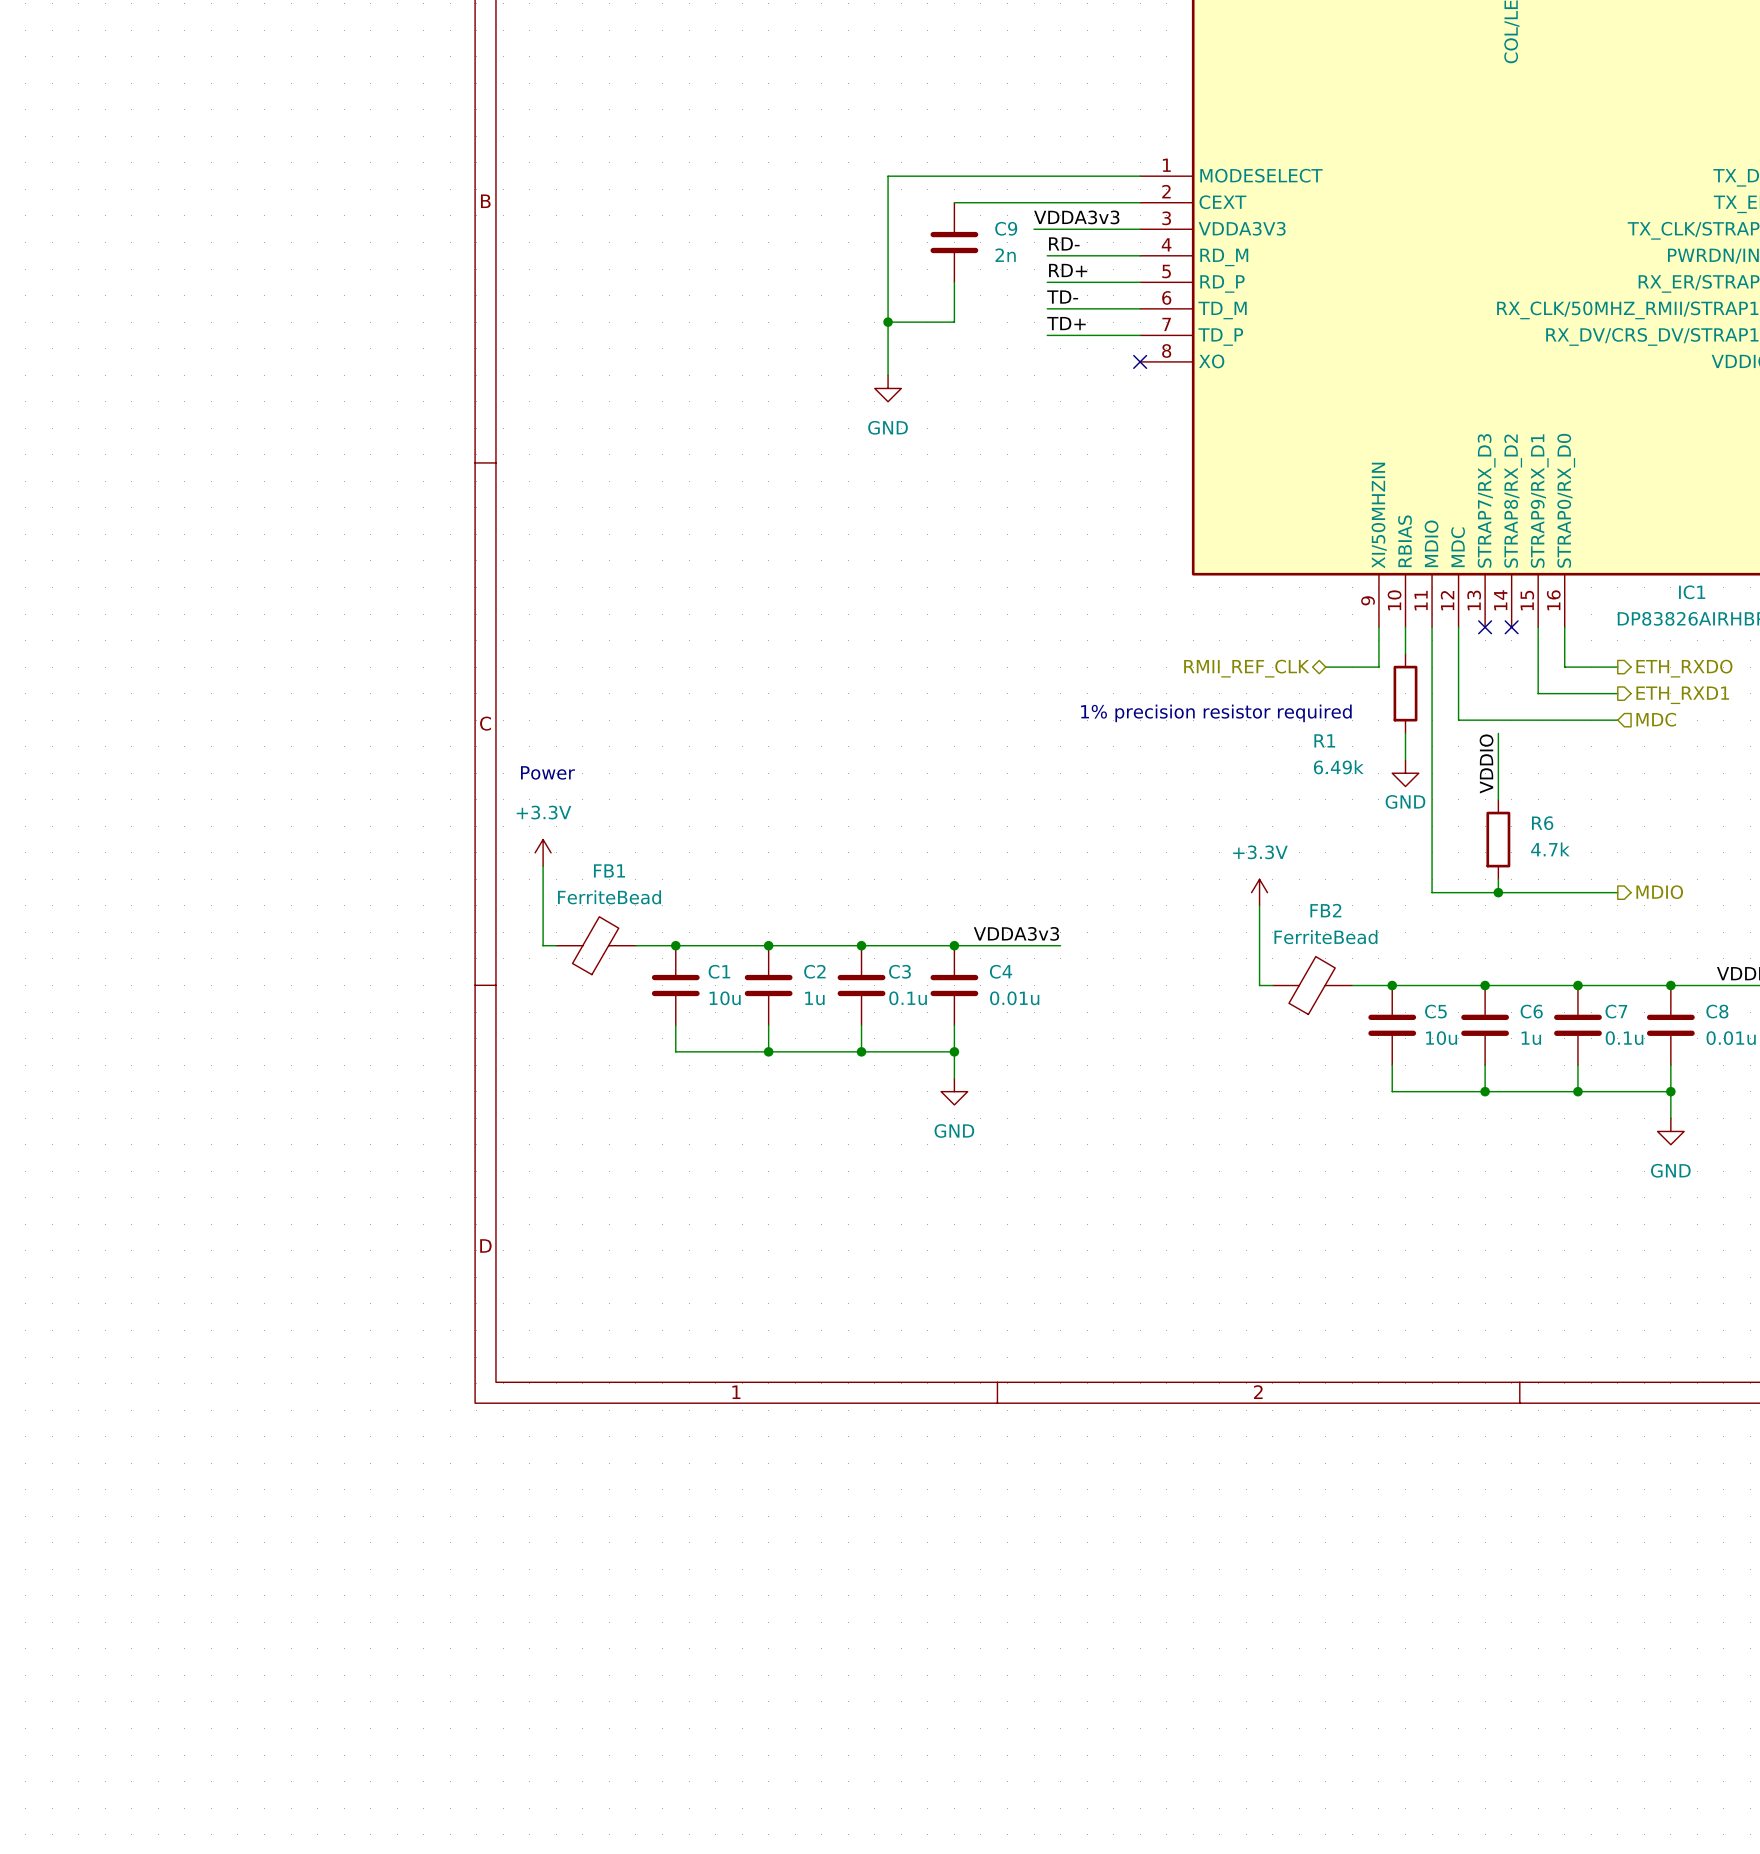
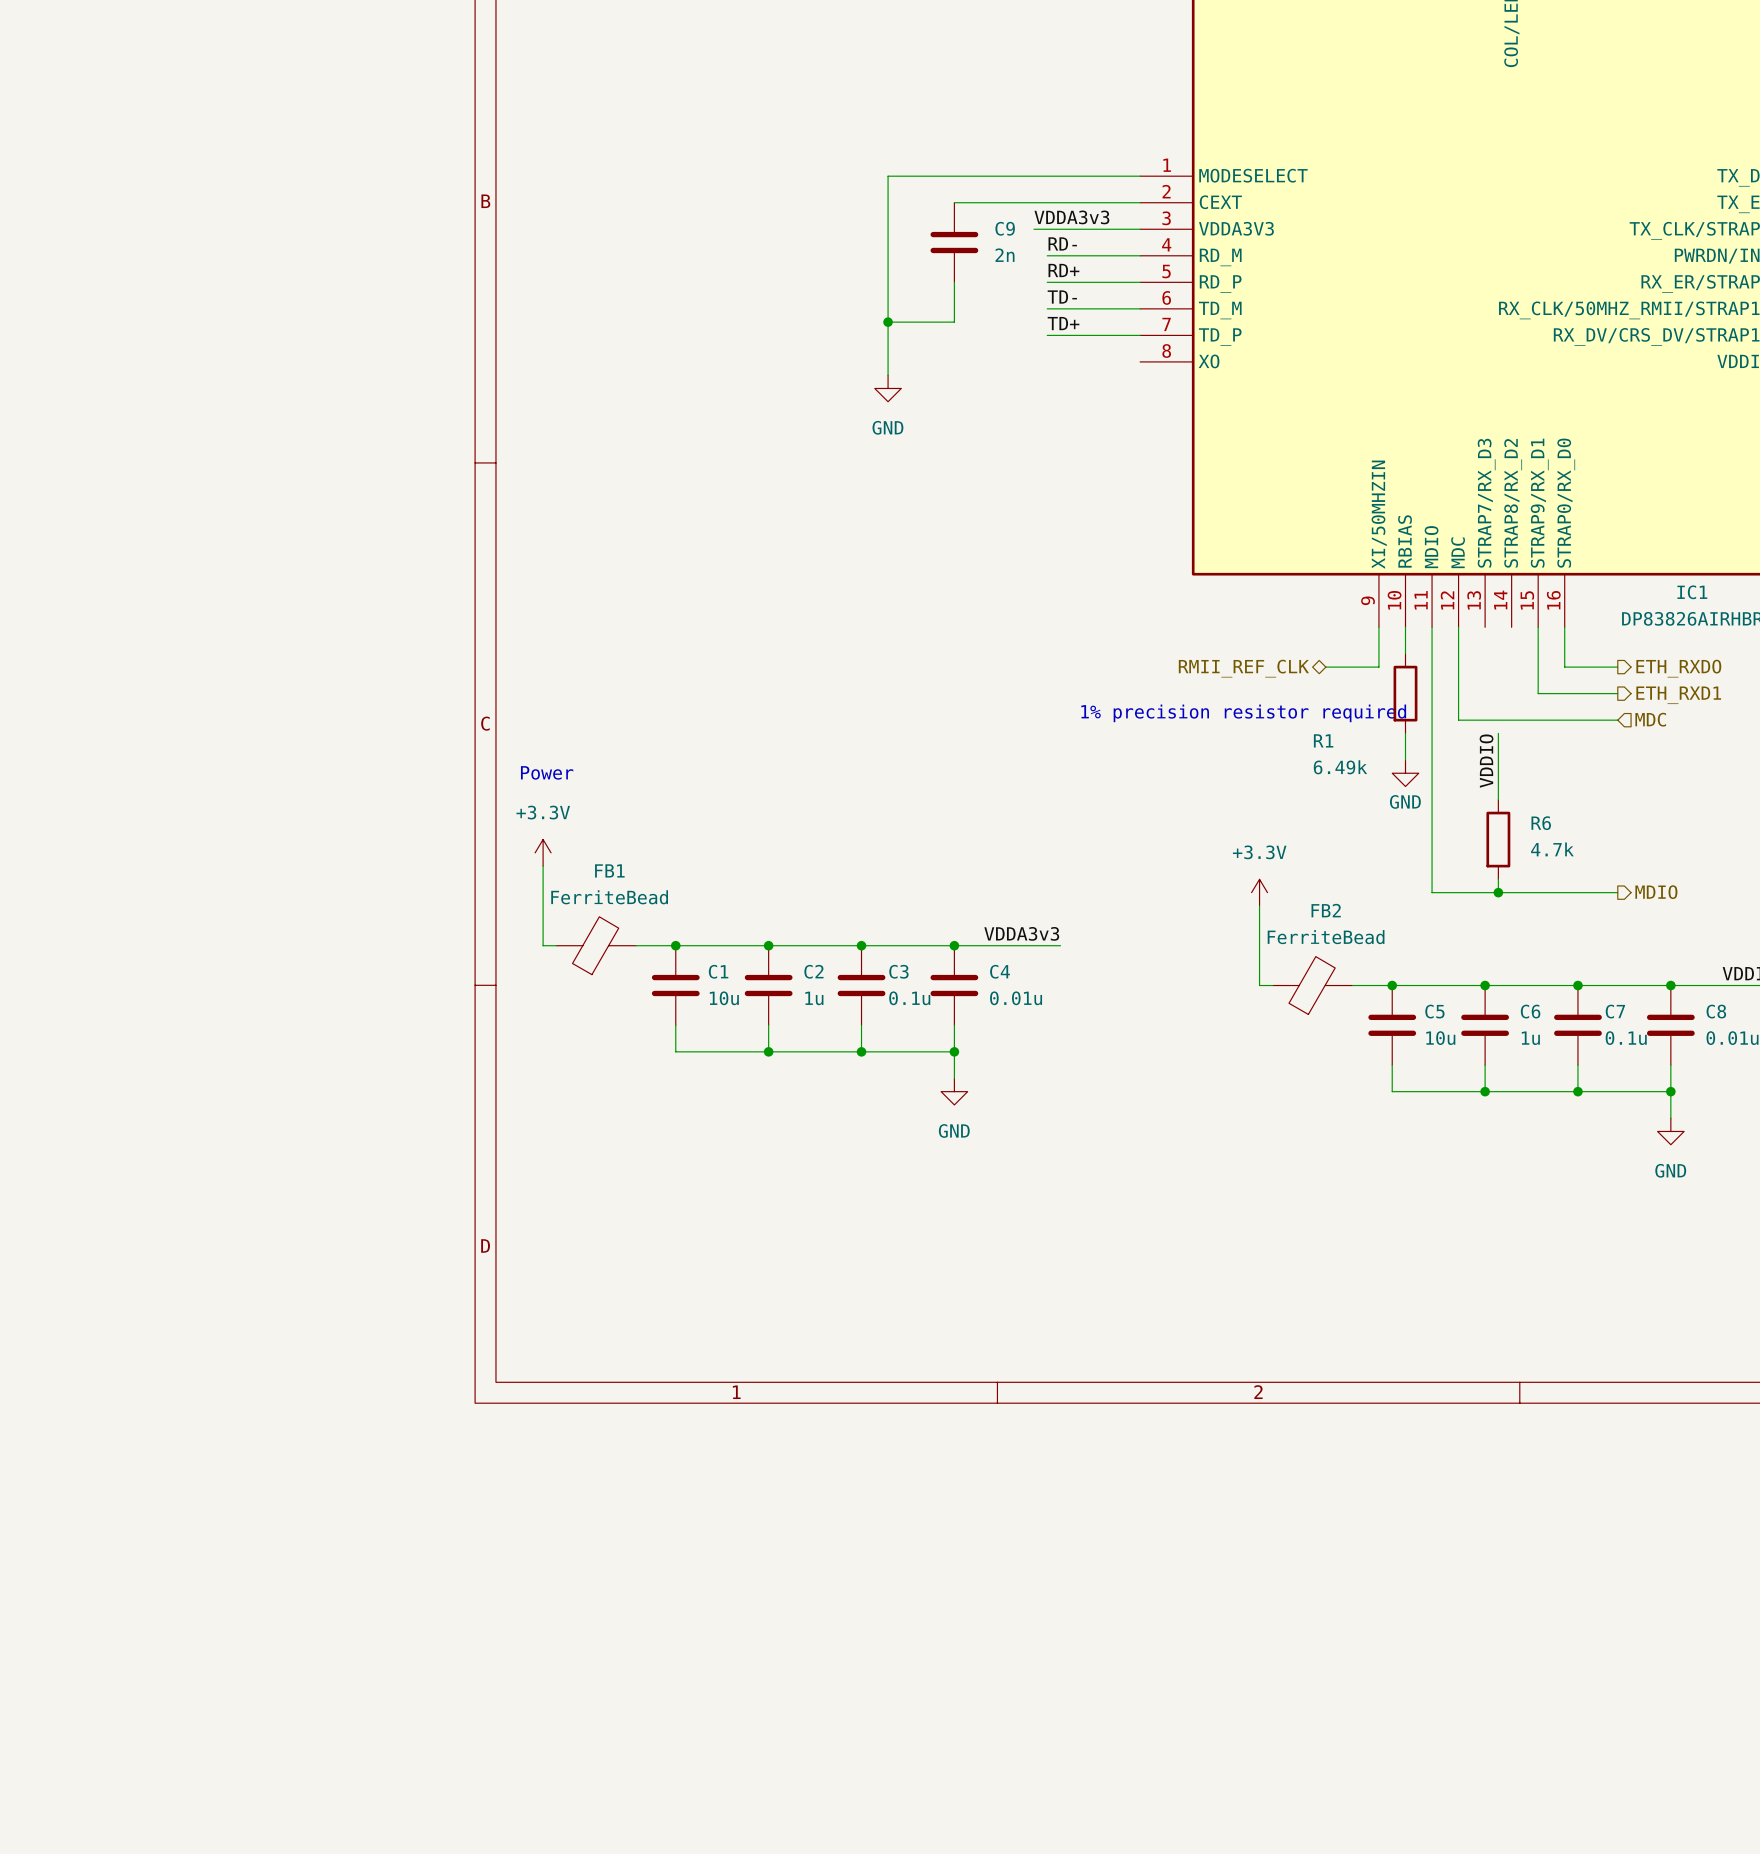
no-connect mark: (1140, 361) -> none
no-connect mark: (1485, 627) -> none
no-connect mark: (1511, 627) -> none

